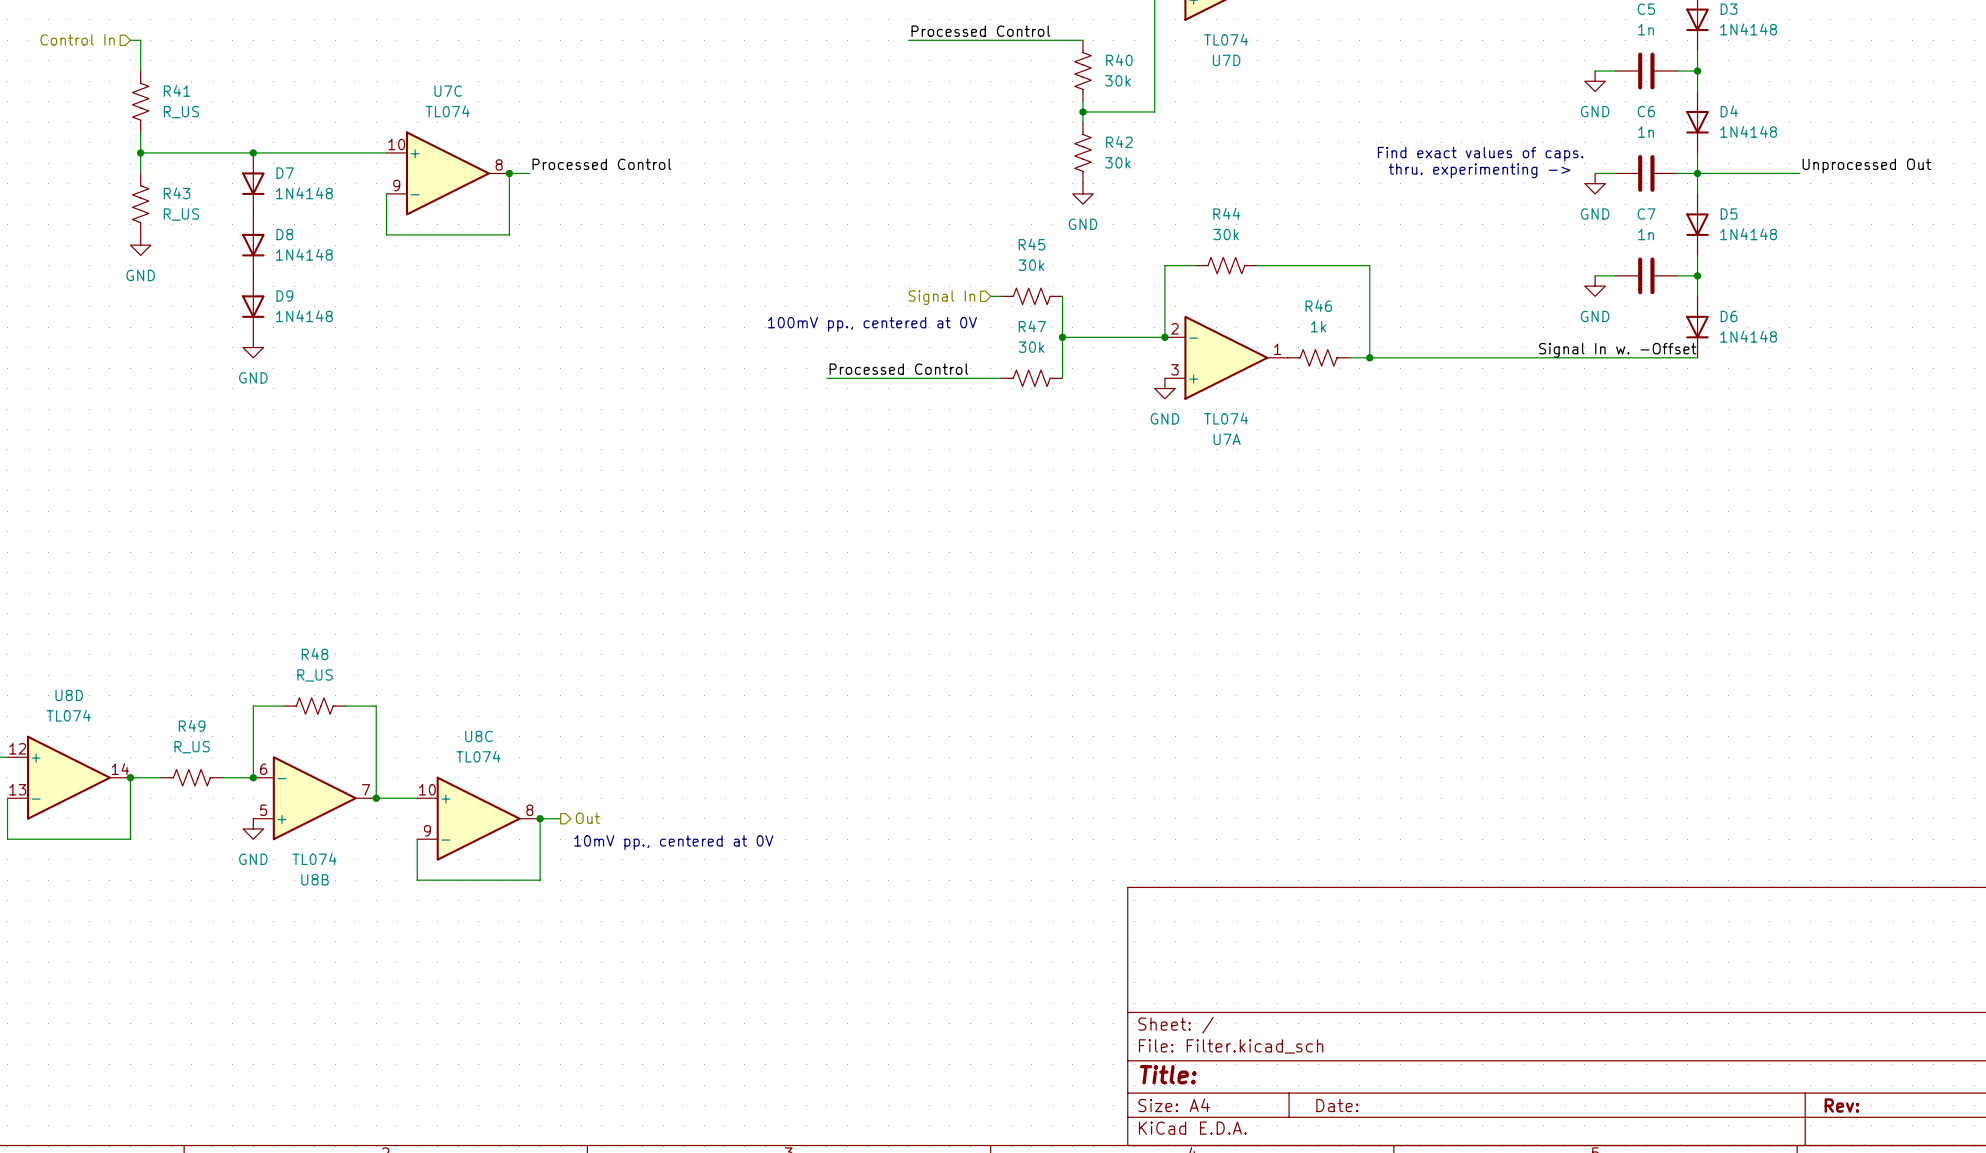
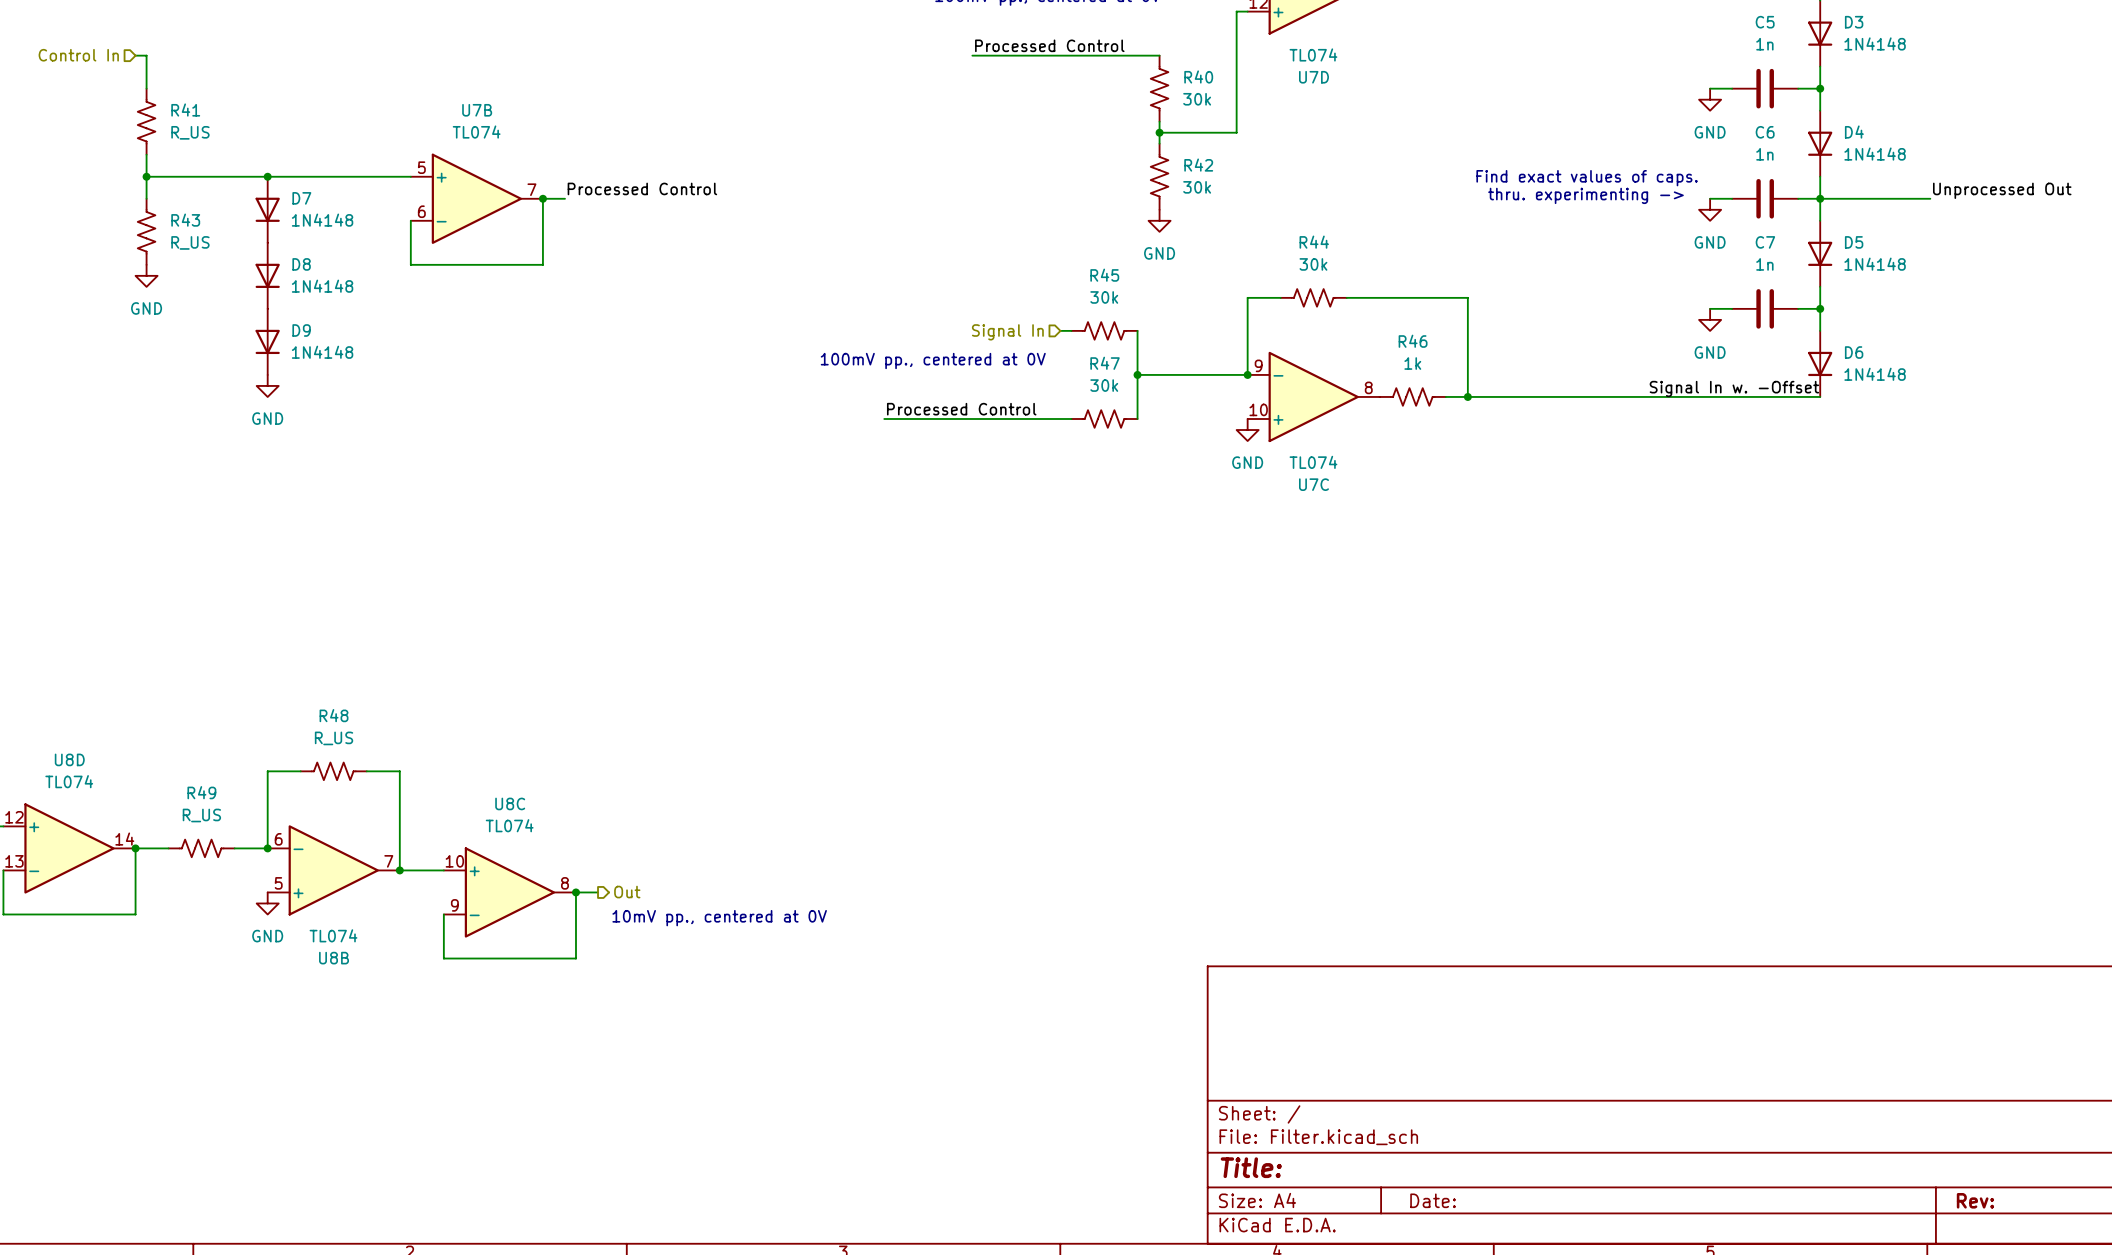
U7C flip: as is (447, 173) -> up-down (1313, 396)
U7C position: (447, 173) -> (1313, 396)
U7B: none -> TL074 (476, 198)
U7A: TL074 (1226, 357) -> none

